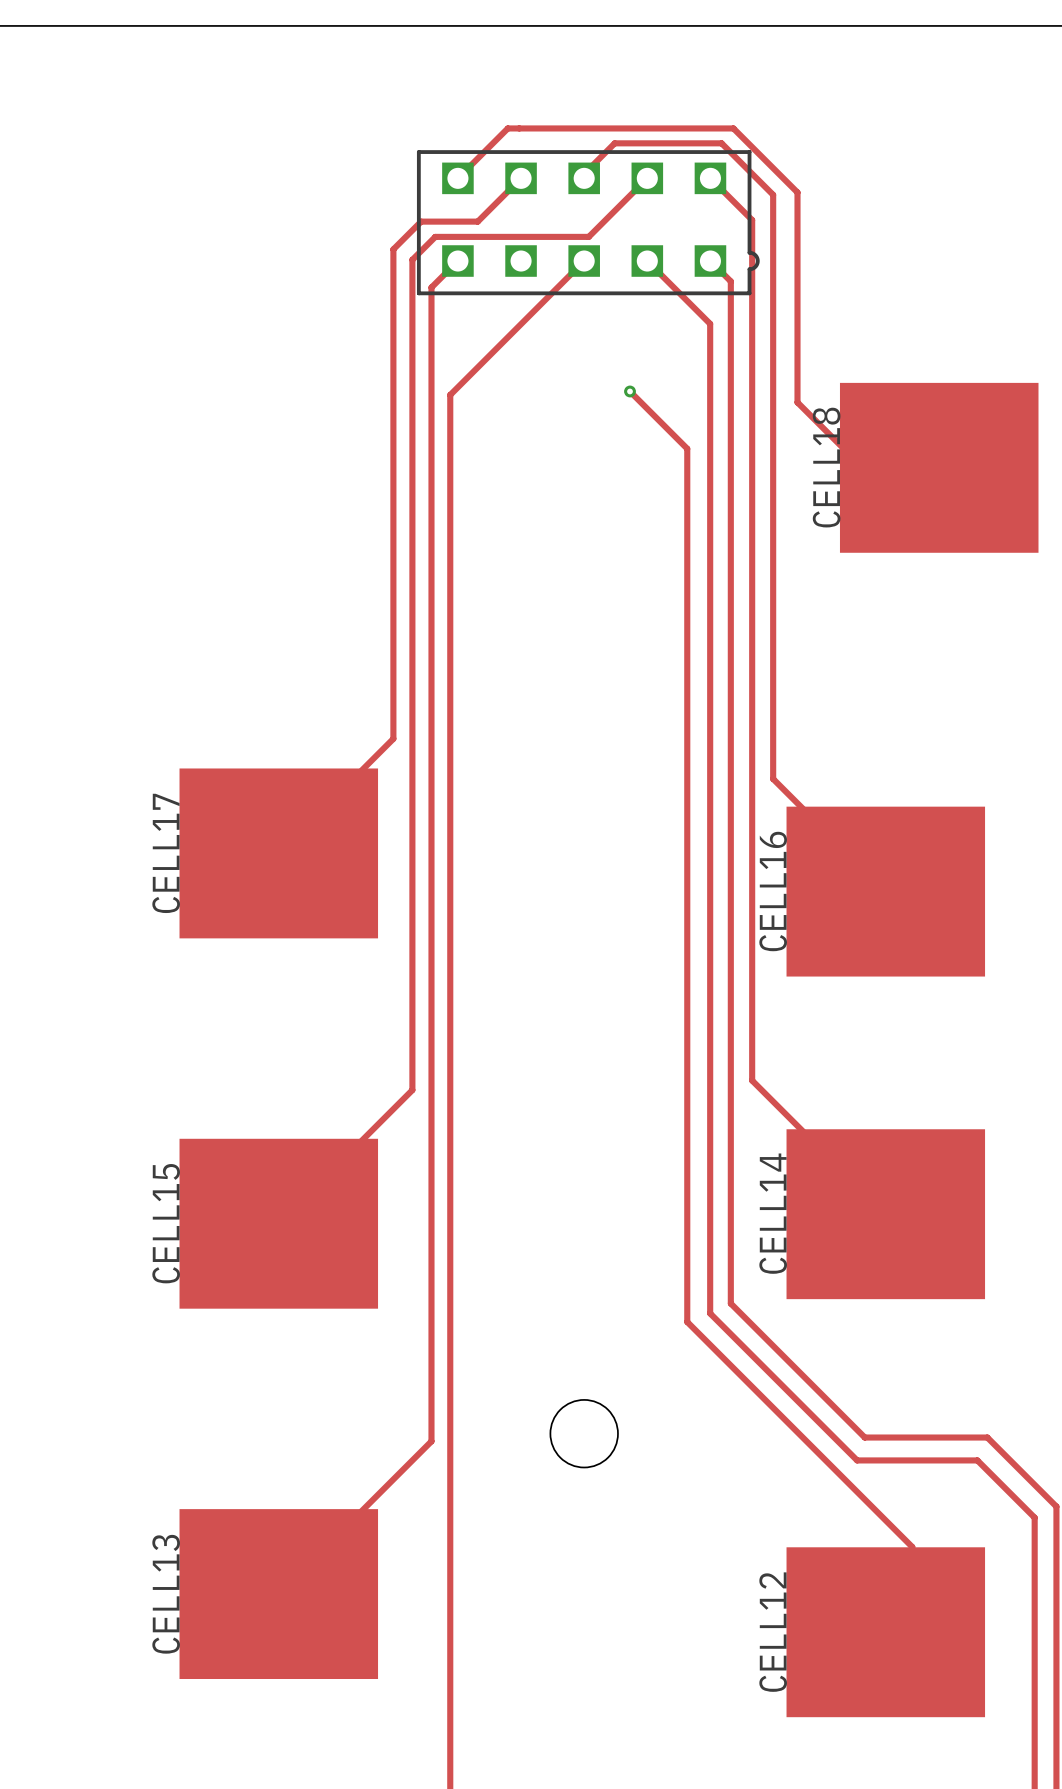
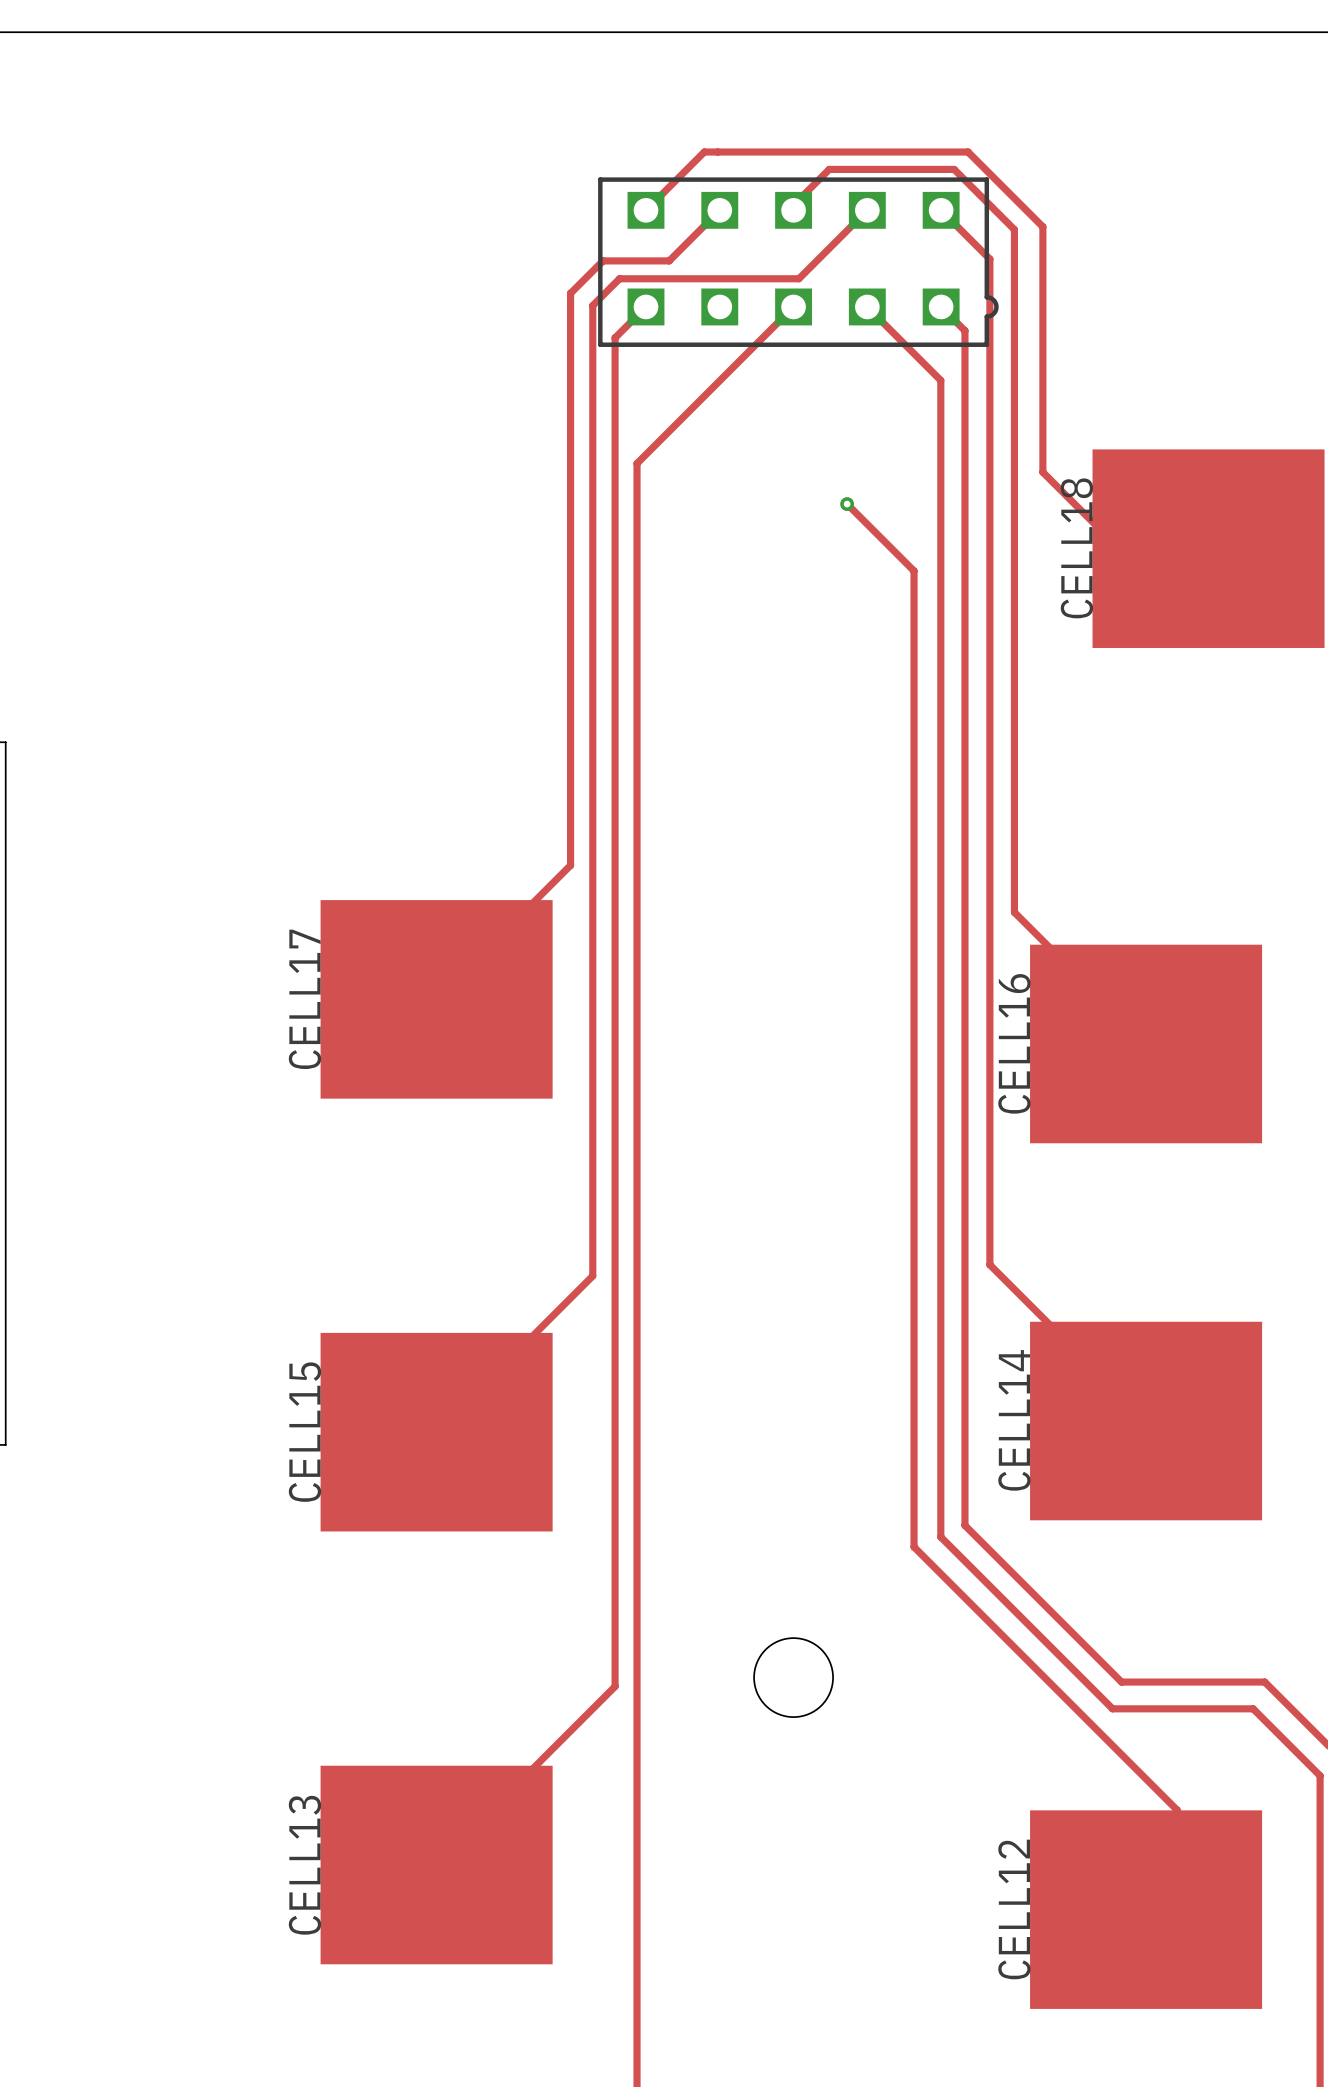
track: (630, 391) (687, 448) (687, 486) -> (847, 504) (914, 571)
via position: (630, 391) -> (847, 504)

